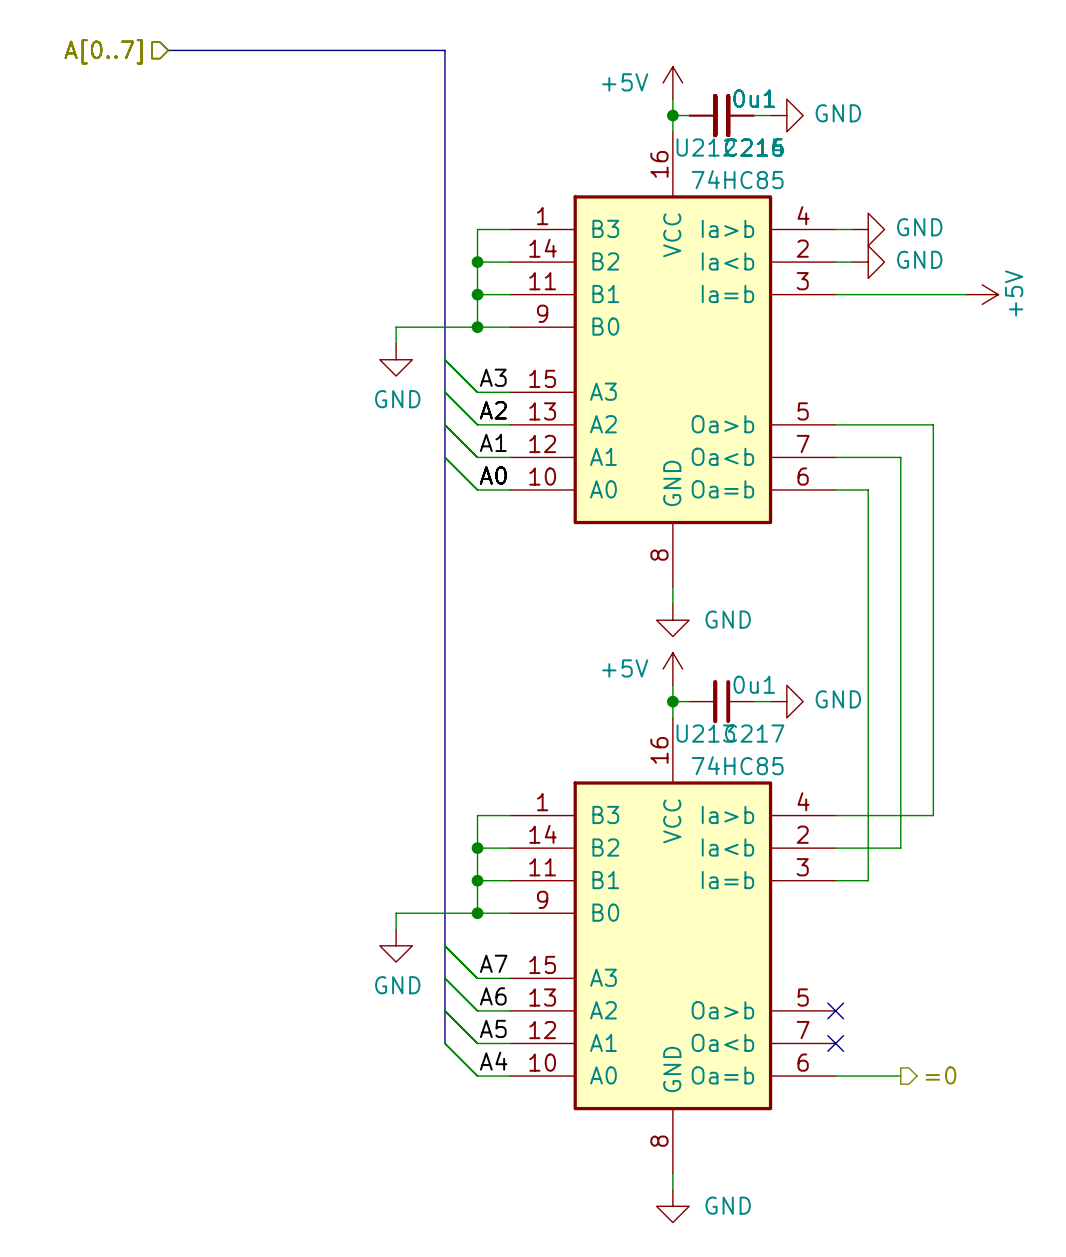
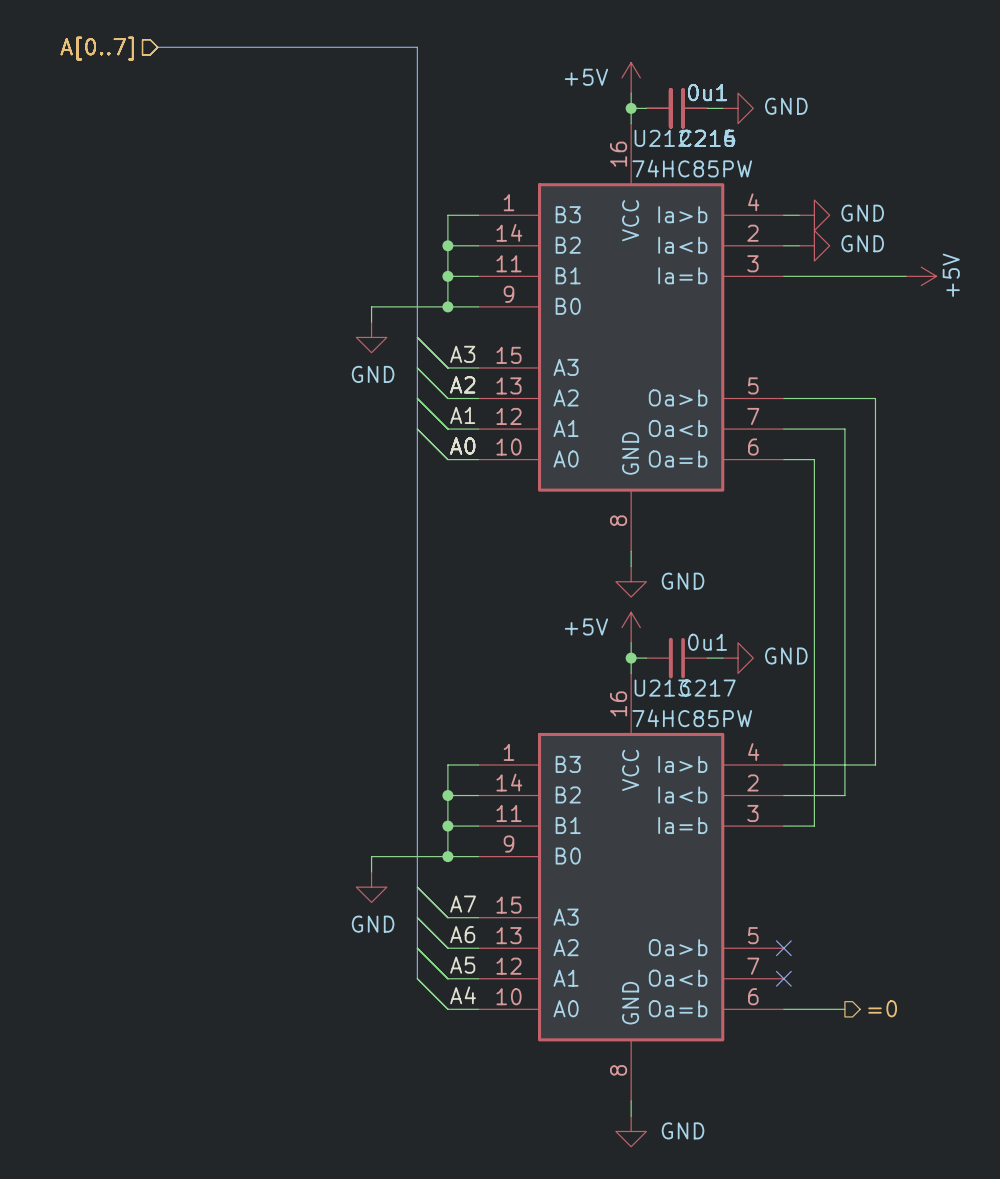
U212 value: 74HC85 (737, 179) -> 74HC85PW (692, 168)
U213 value: 74HC85 (737, 765) -> 74HC85PW (692, 718)

